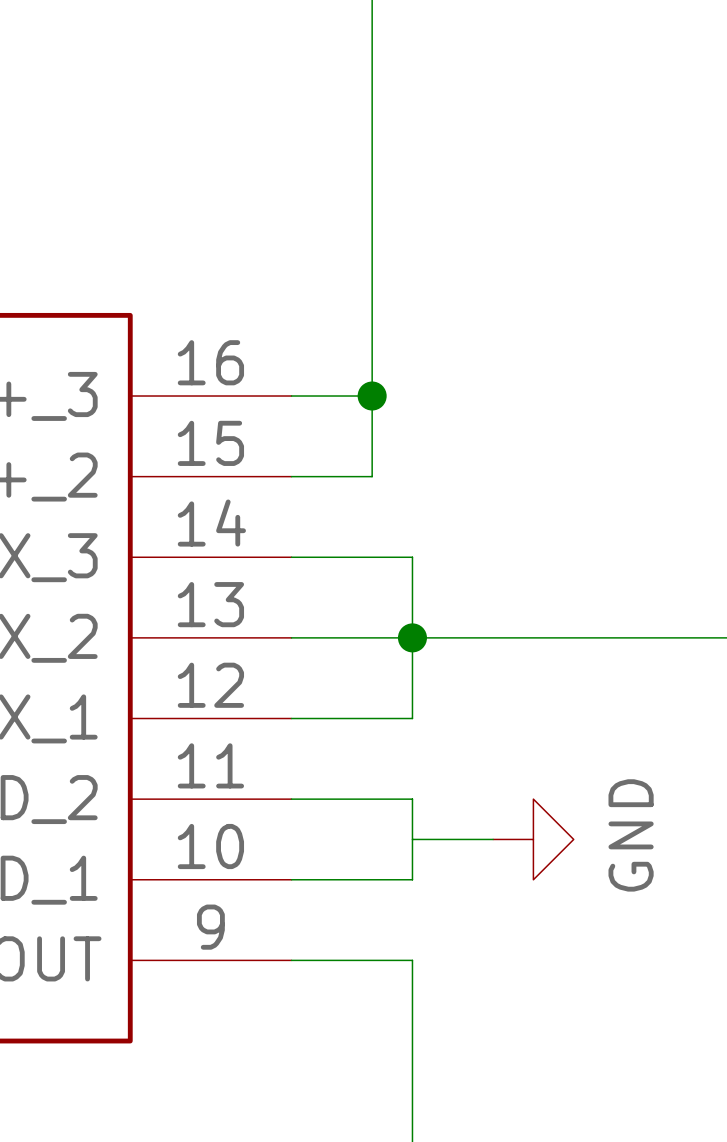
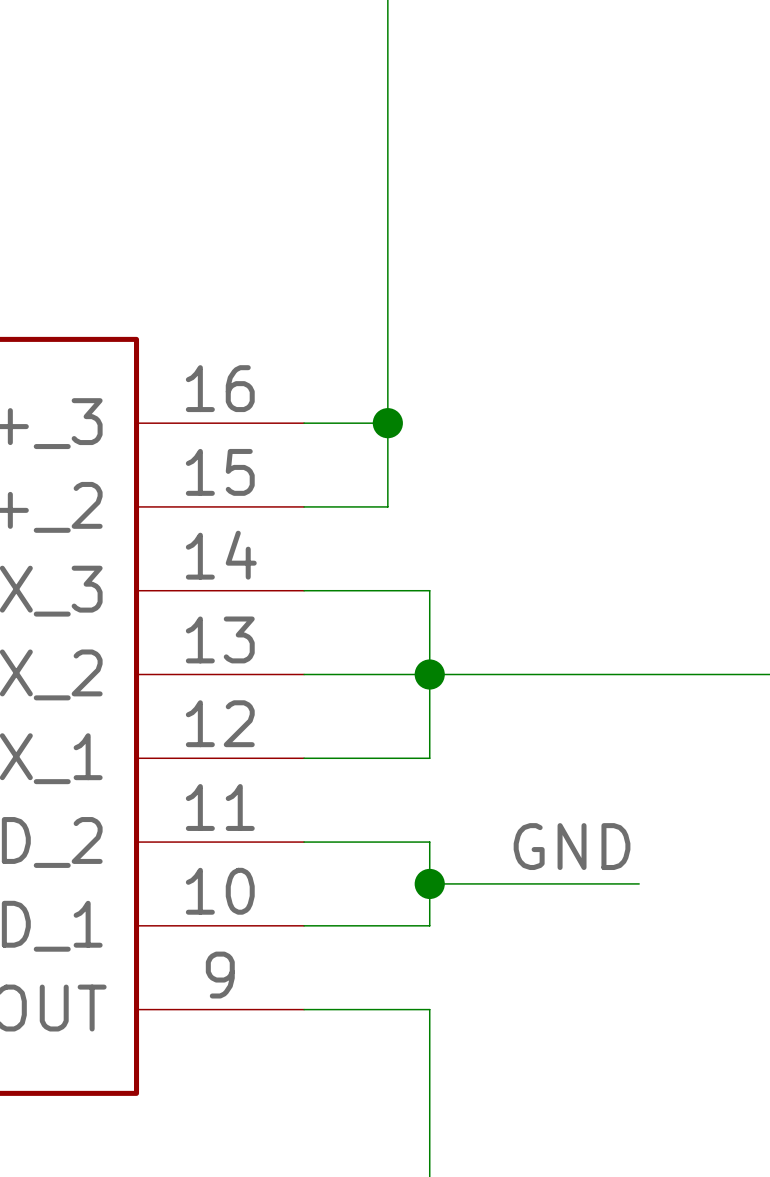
label: none -> GND (572, 846)
junction: none -> (429, 883)
wire: none -> (513, 883) (639, 883)
power symbol: GND (533, 839) -> none

